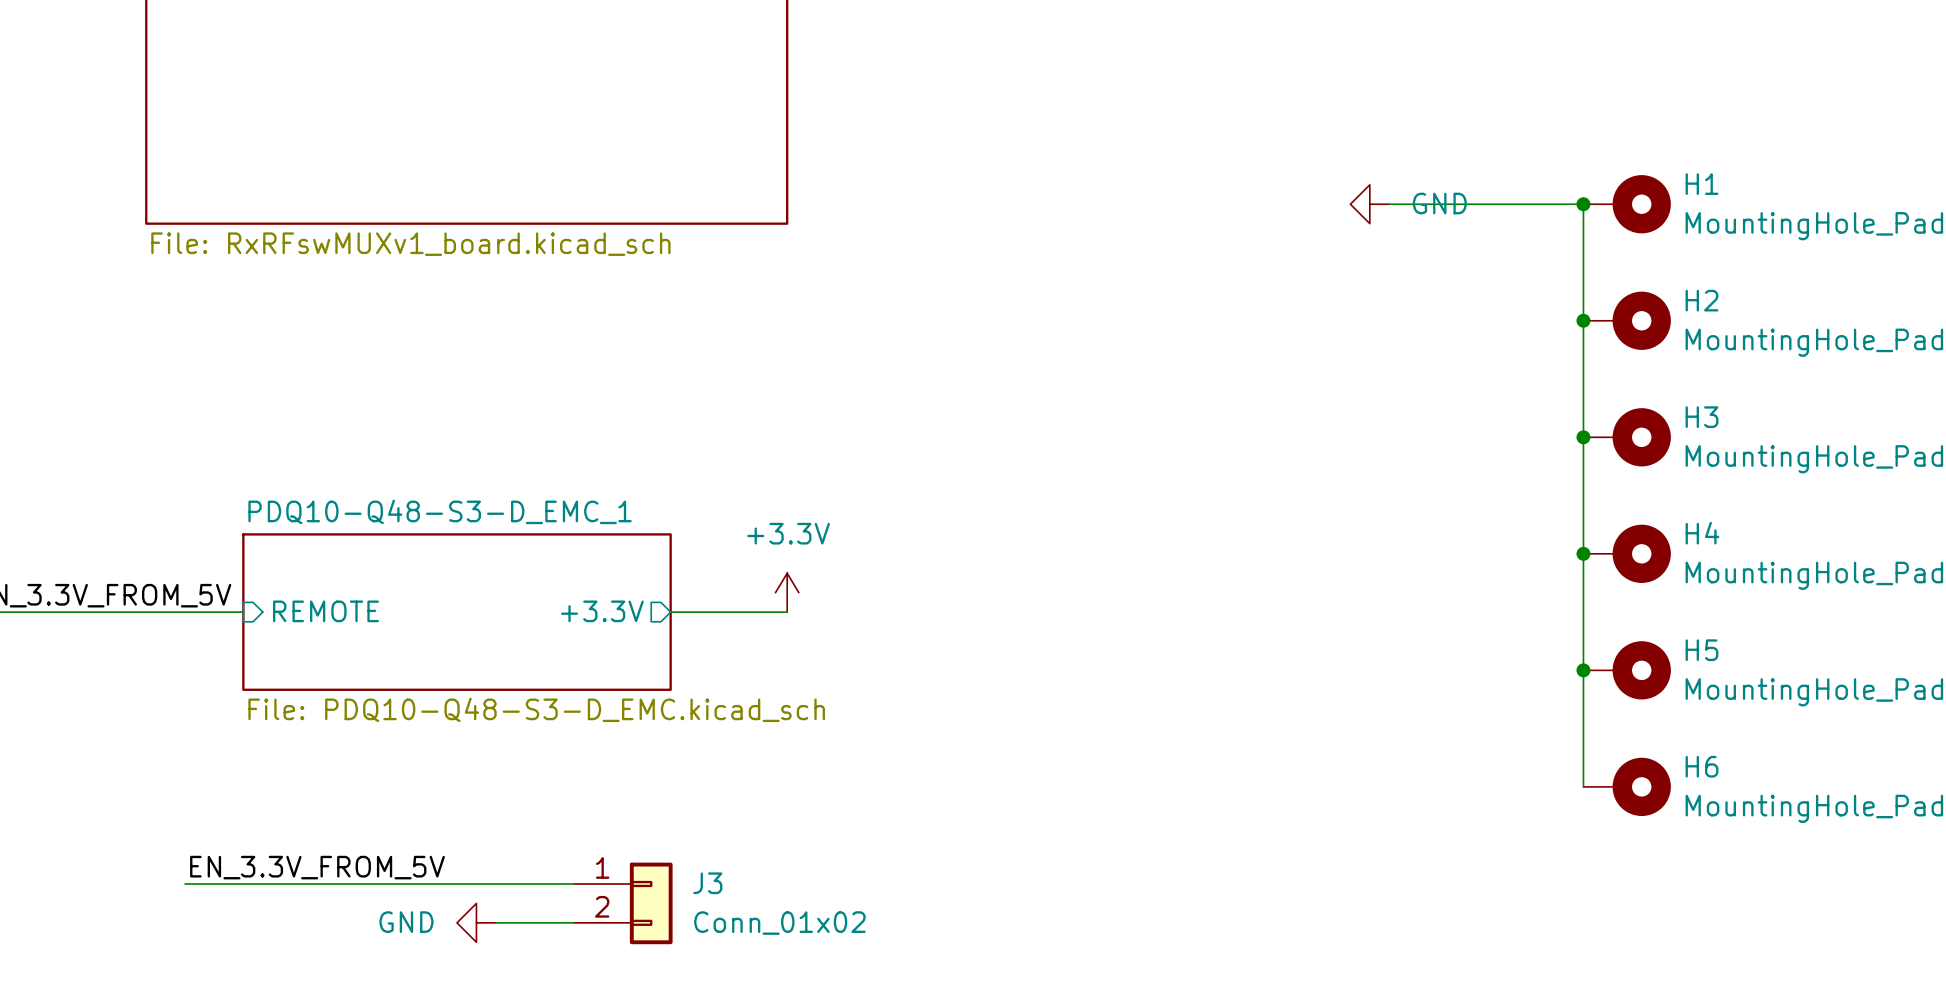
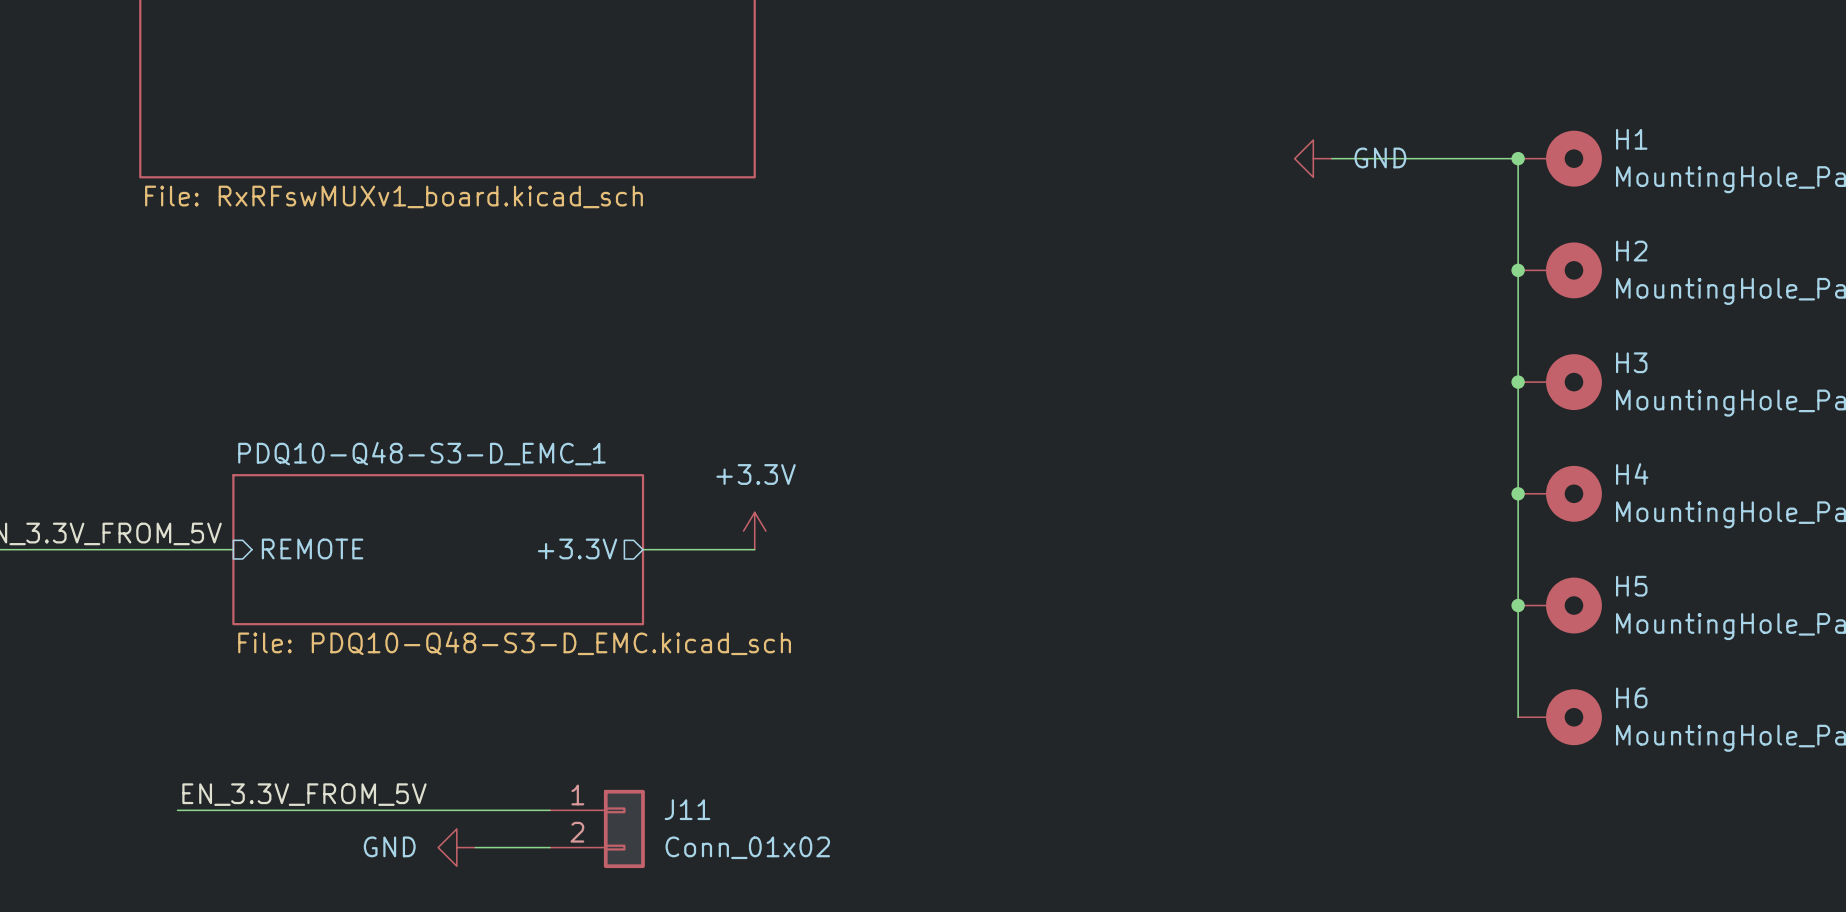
J3 name: J3 (707, 883) -> J11 (687, 809)

